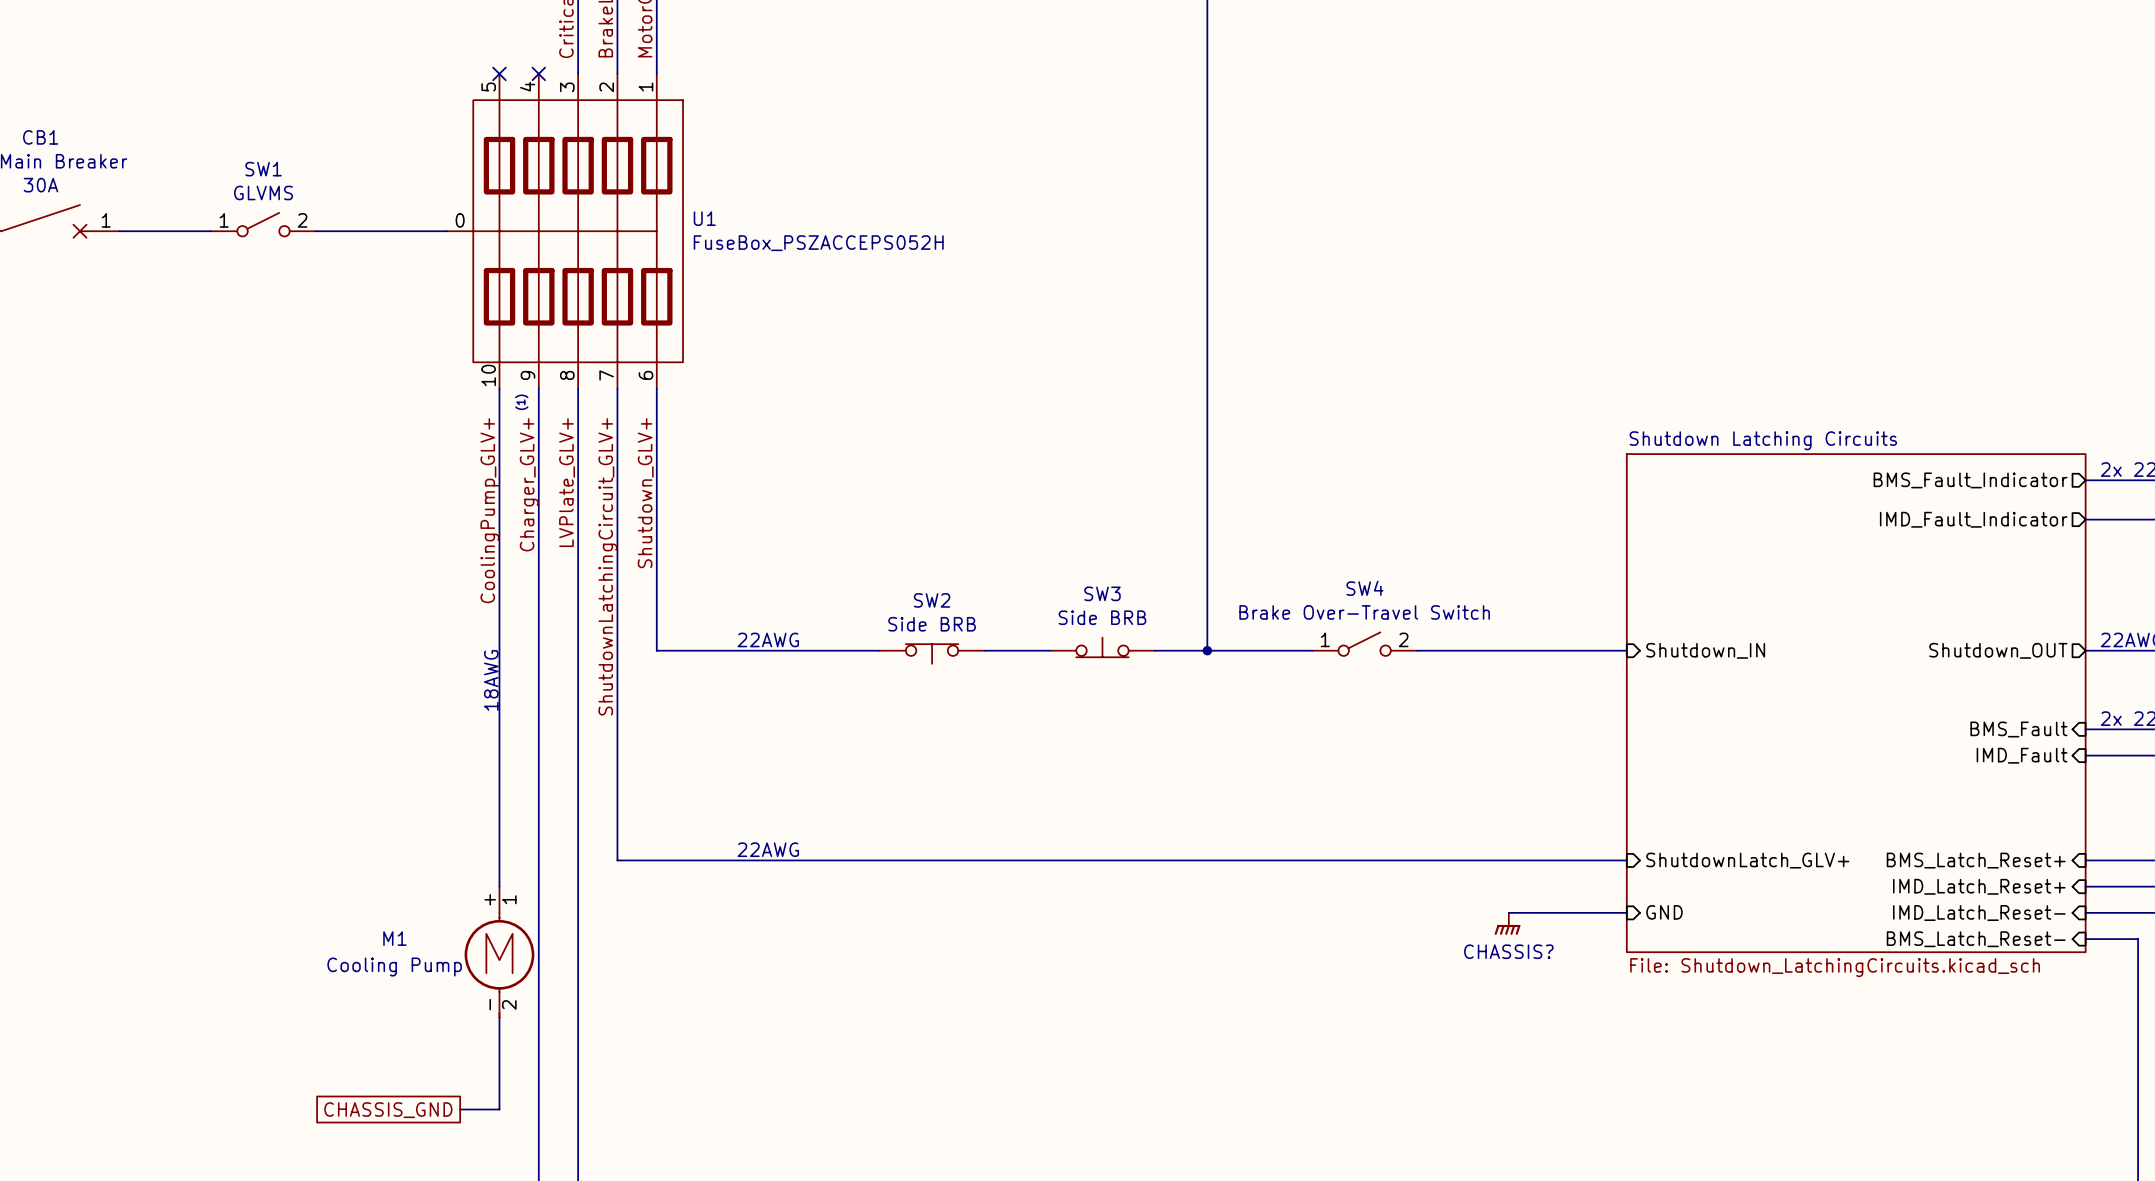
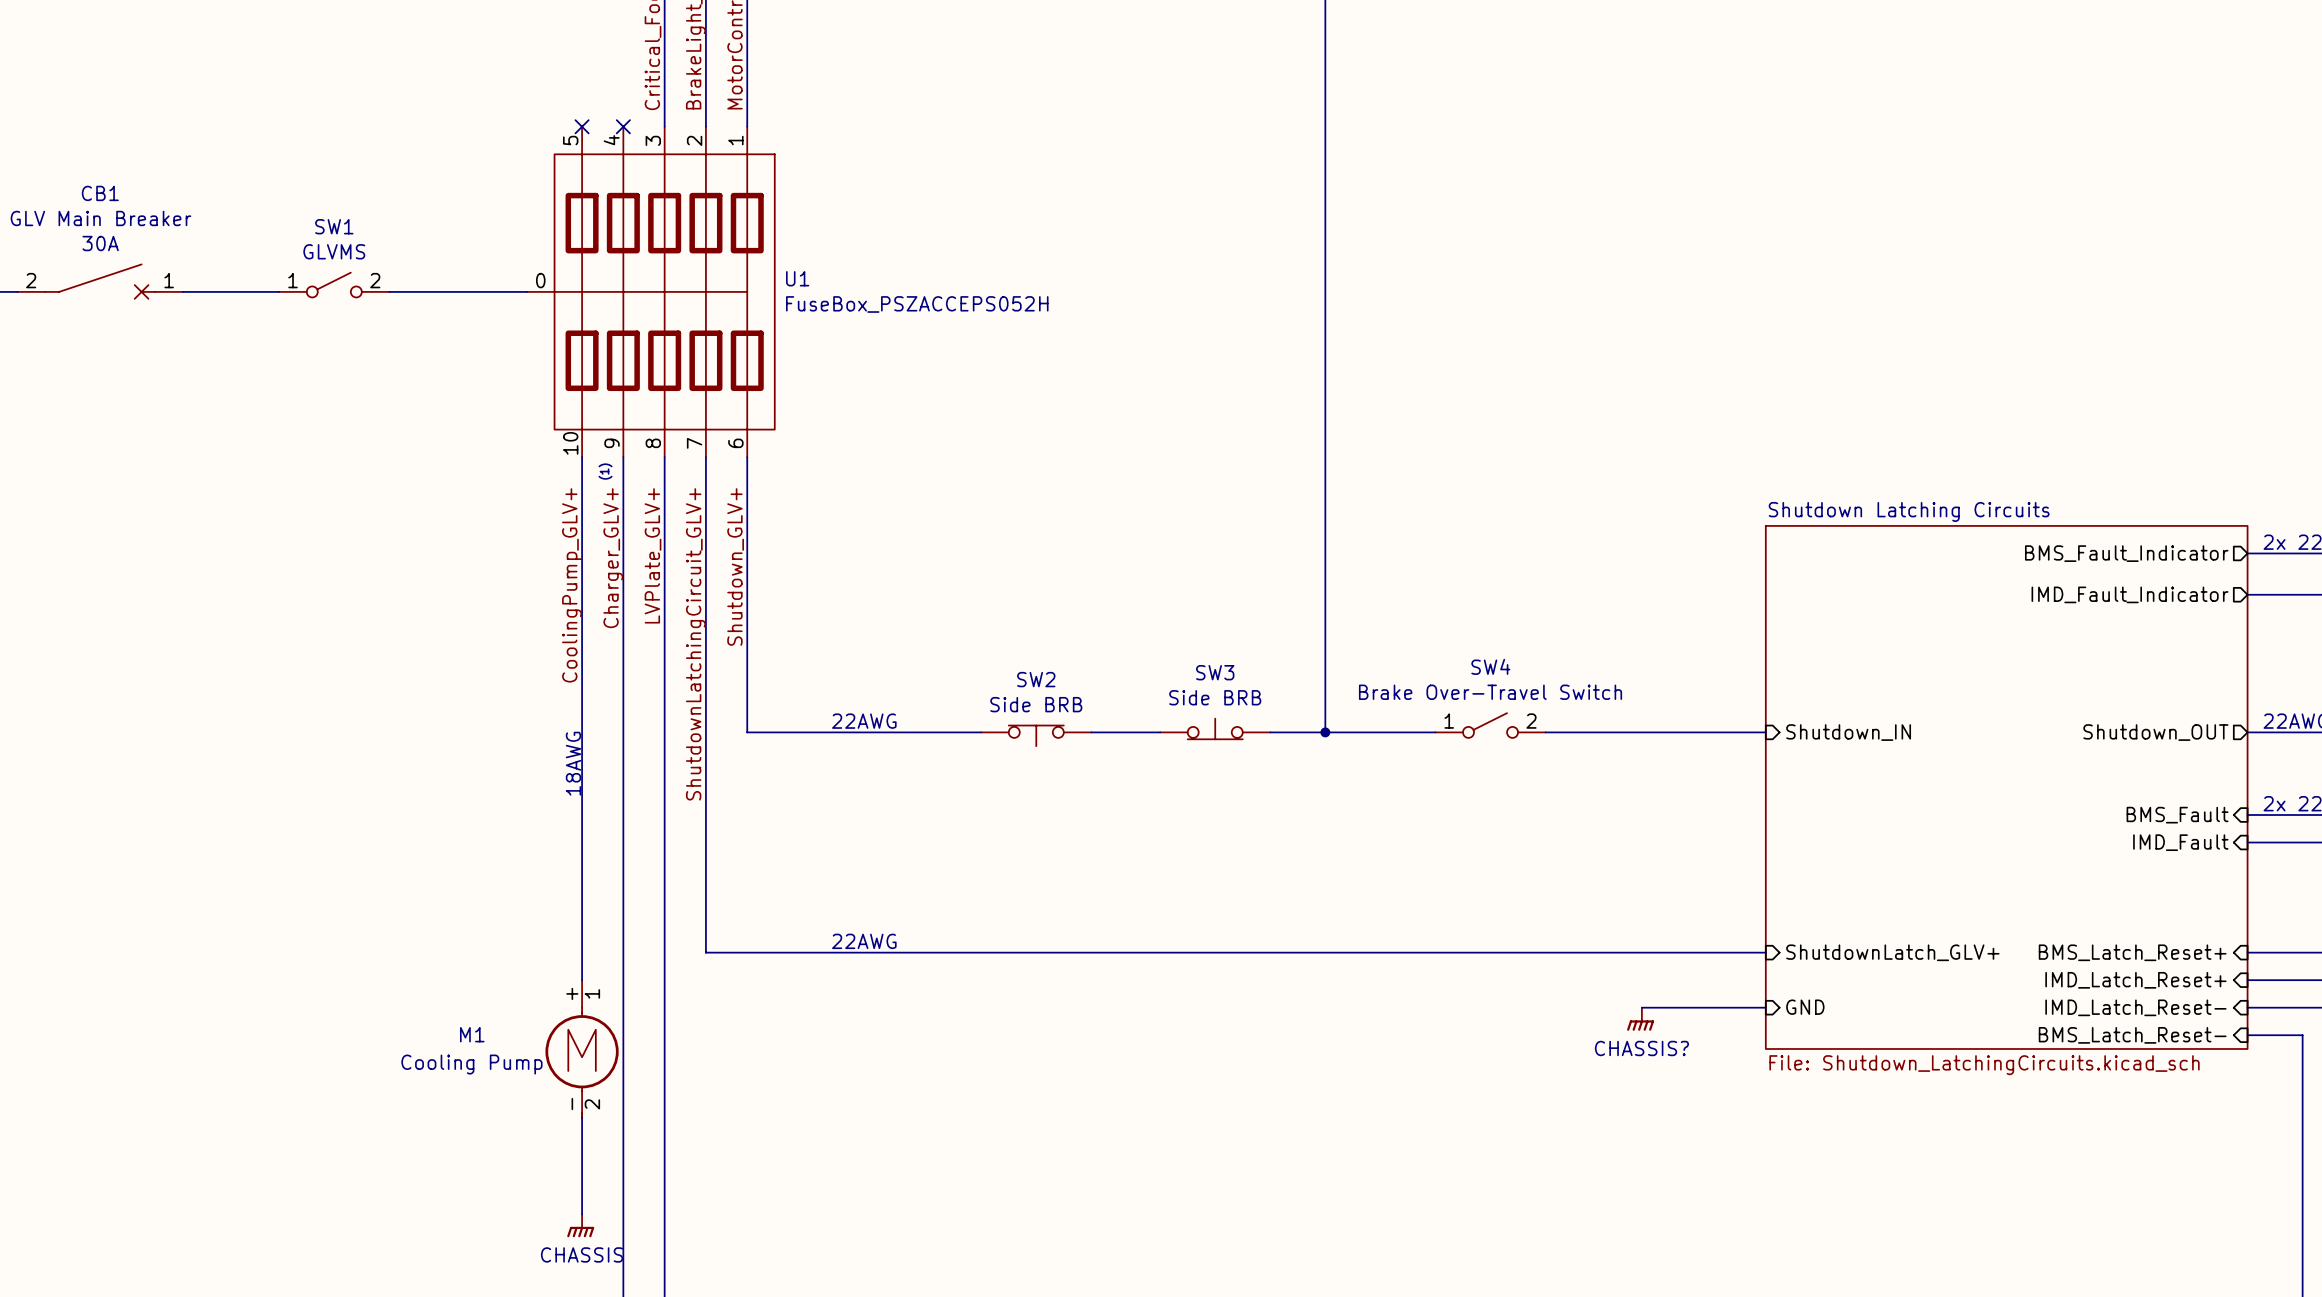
wire: (460, 1109) (499, 1109) -> none
global label: CHASSIS_GND (388, 1110) -> none
CHASSIS: none -> (580, 1225)

